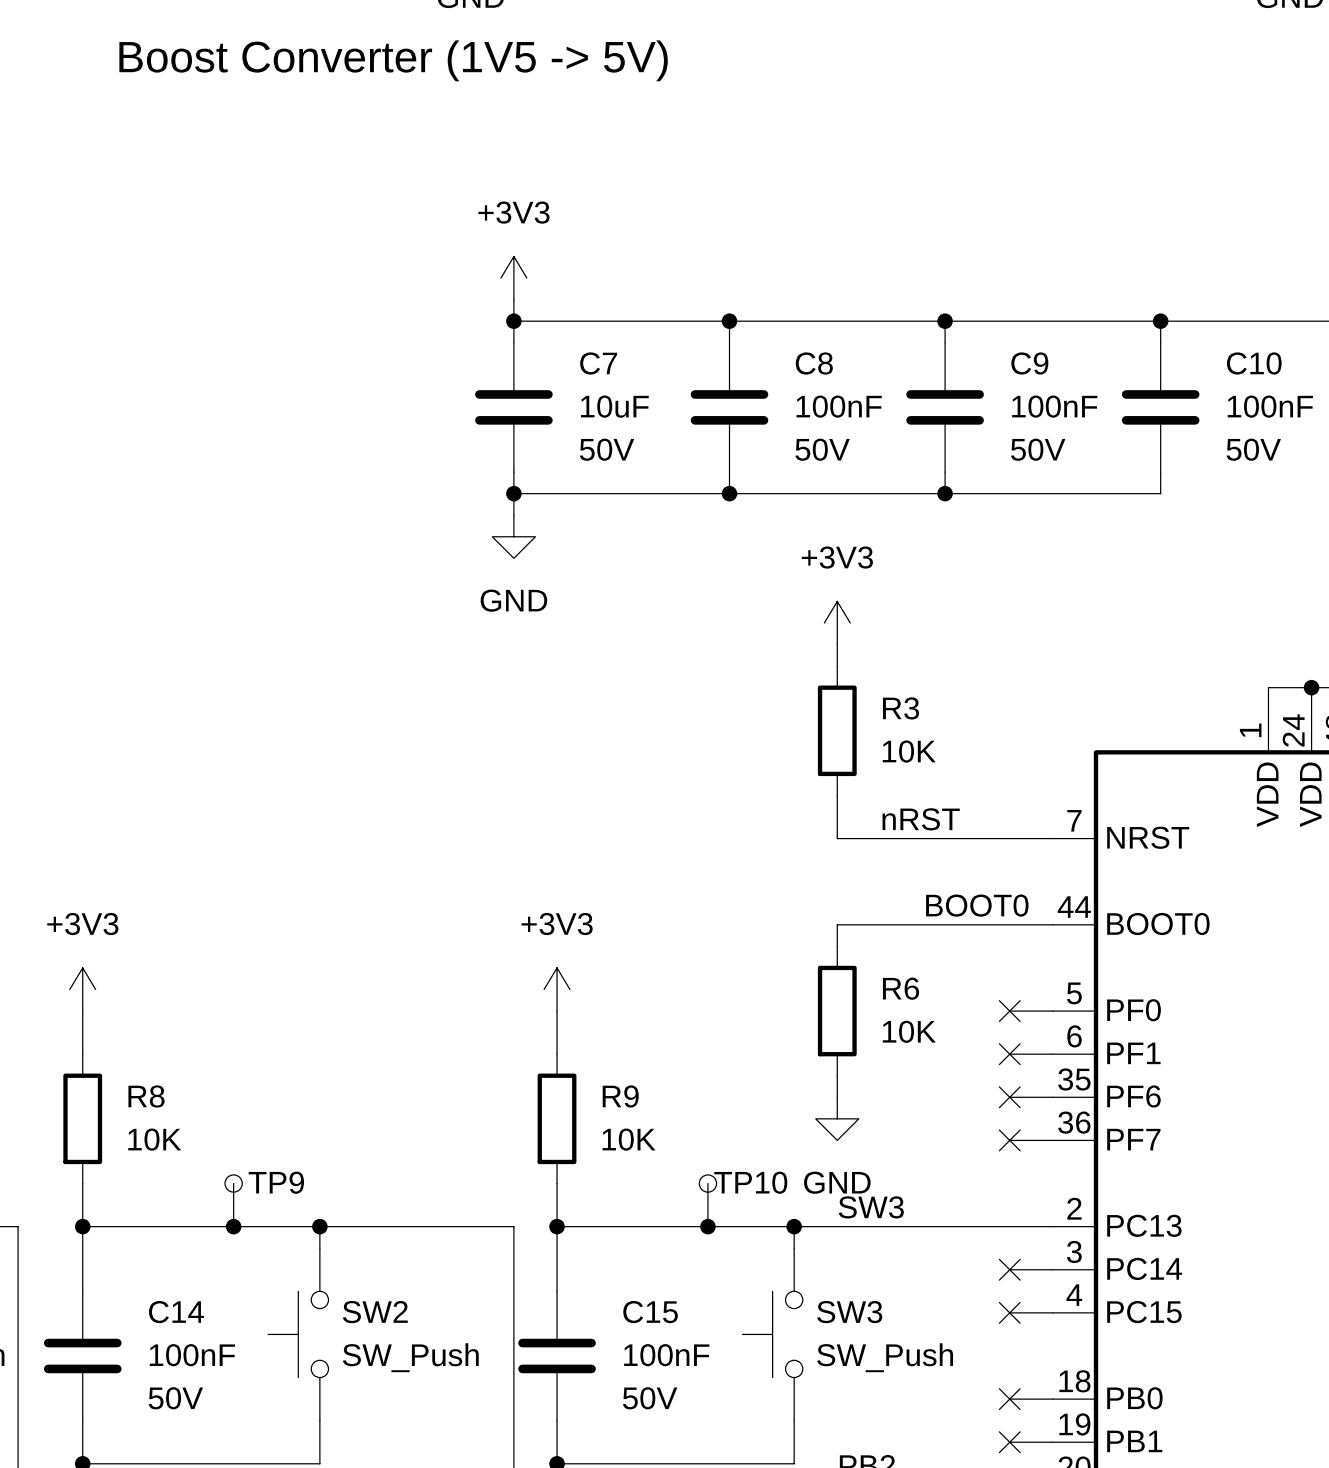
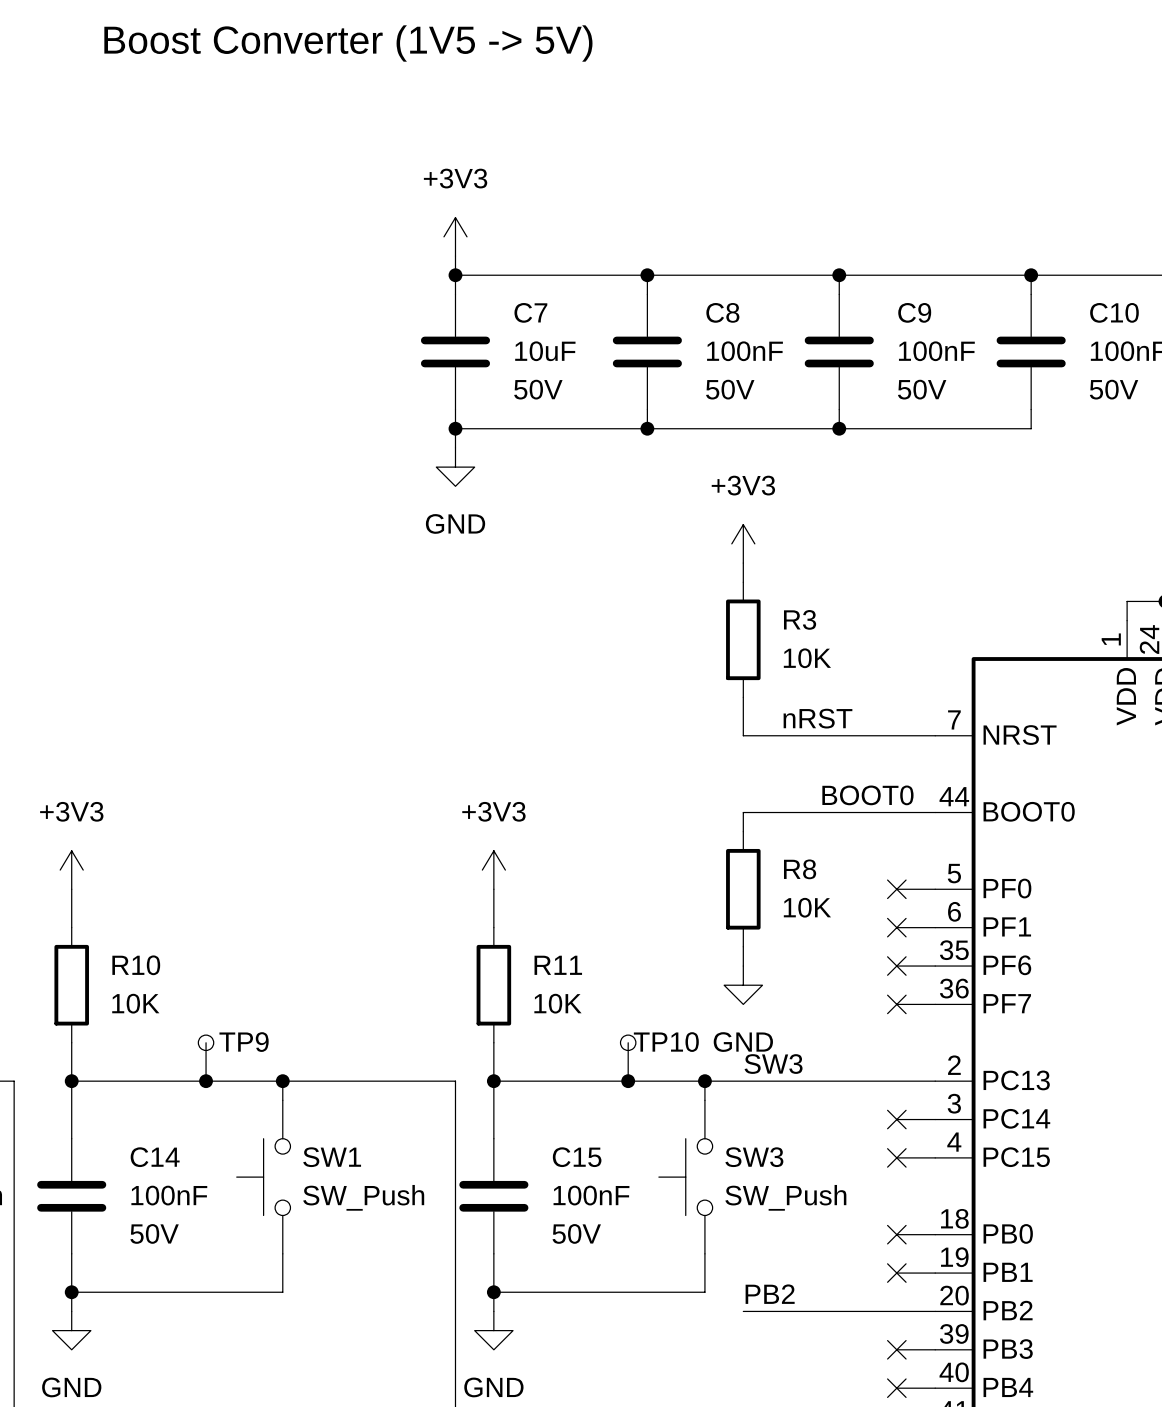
R6 name: R6 (901, 988) -> R8 (800, 869)
R8 name: R8 (146, 1096) -> R10 (136, 965)
R9 name: R9 (620, 1096) -> R11 (558, 965)
SW2 name: SW2 (375, 1312) -> SW1 (332, 1157)

